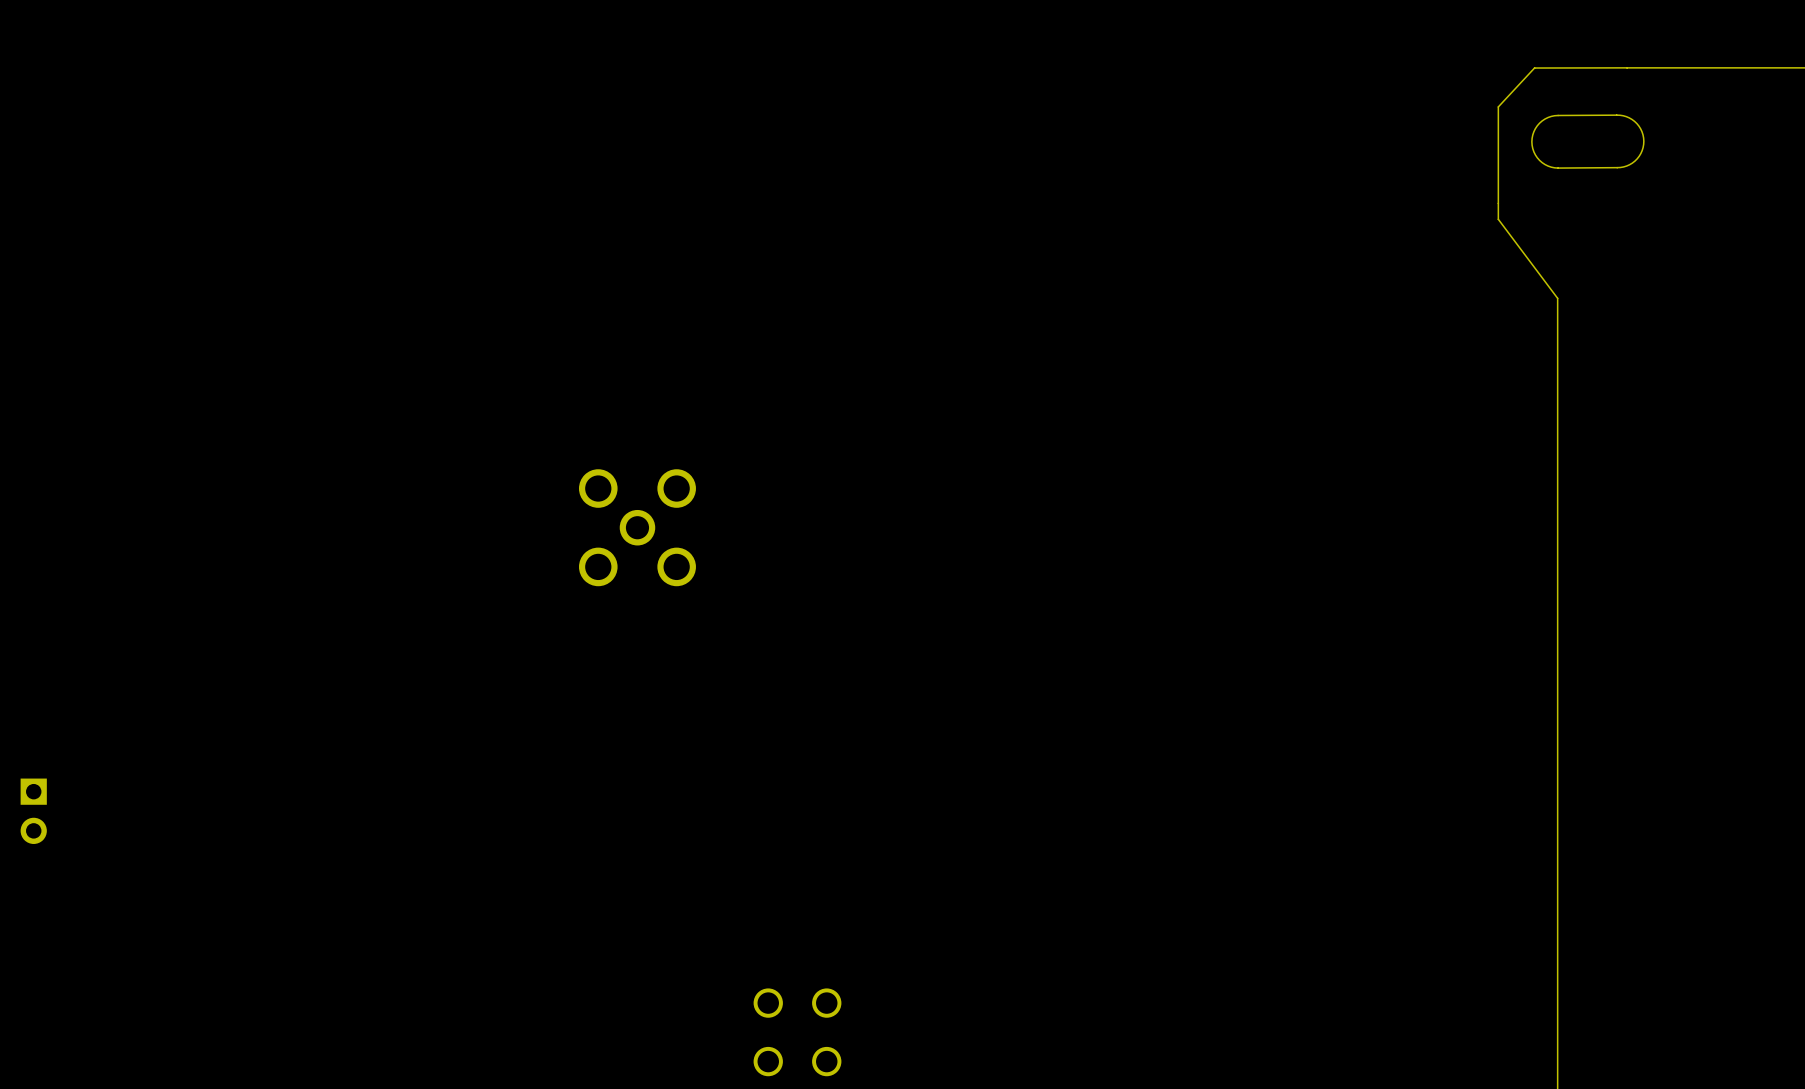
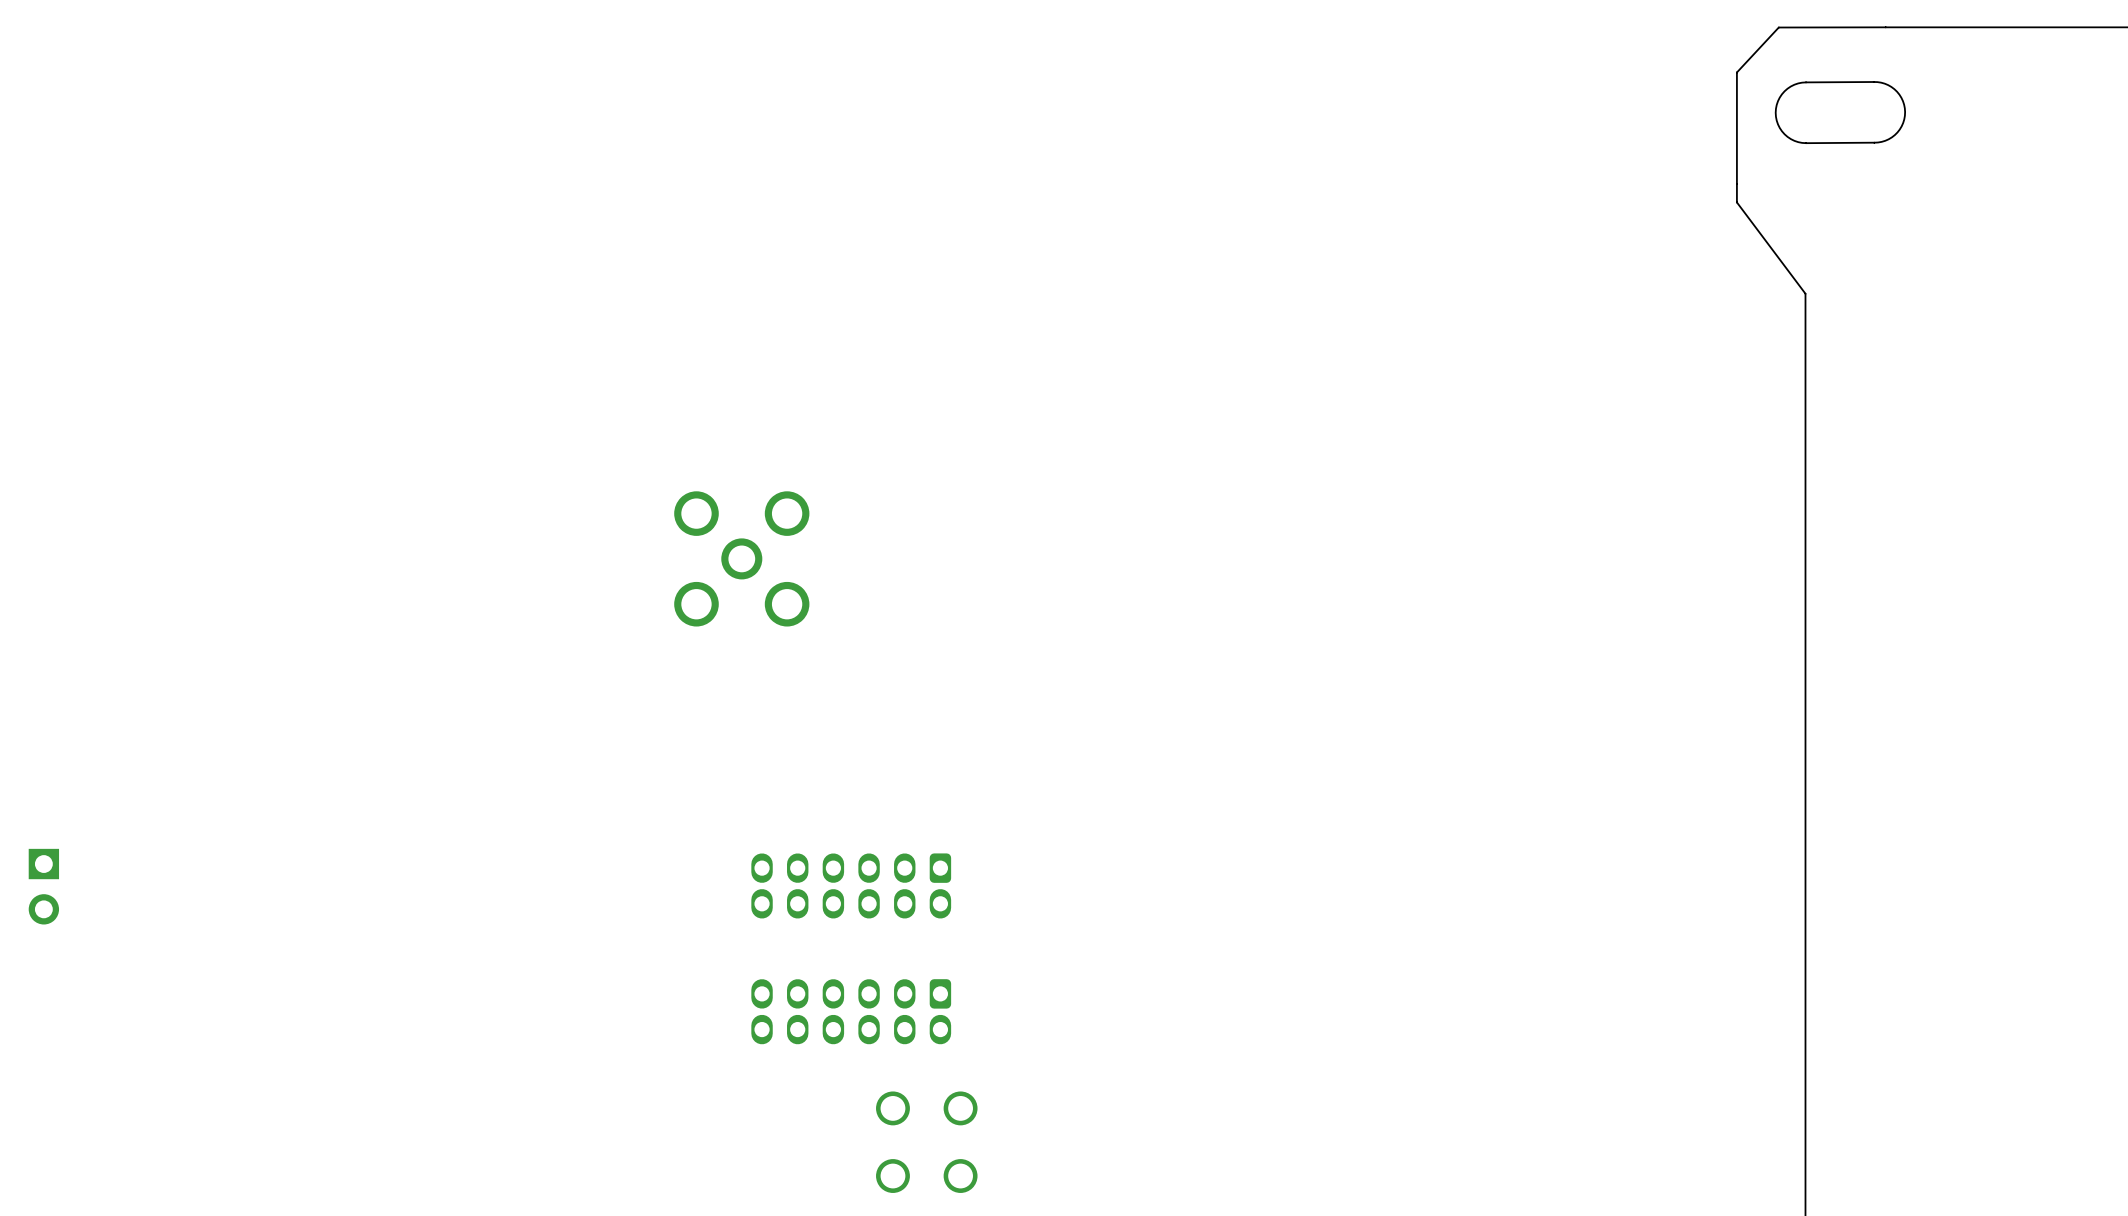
part: none -> (851, 885)
part: none -> (851, 1011)

